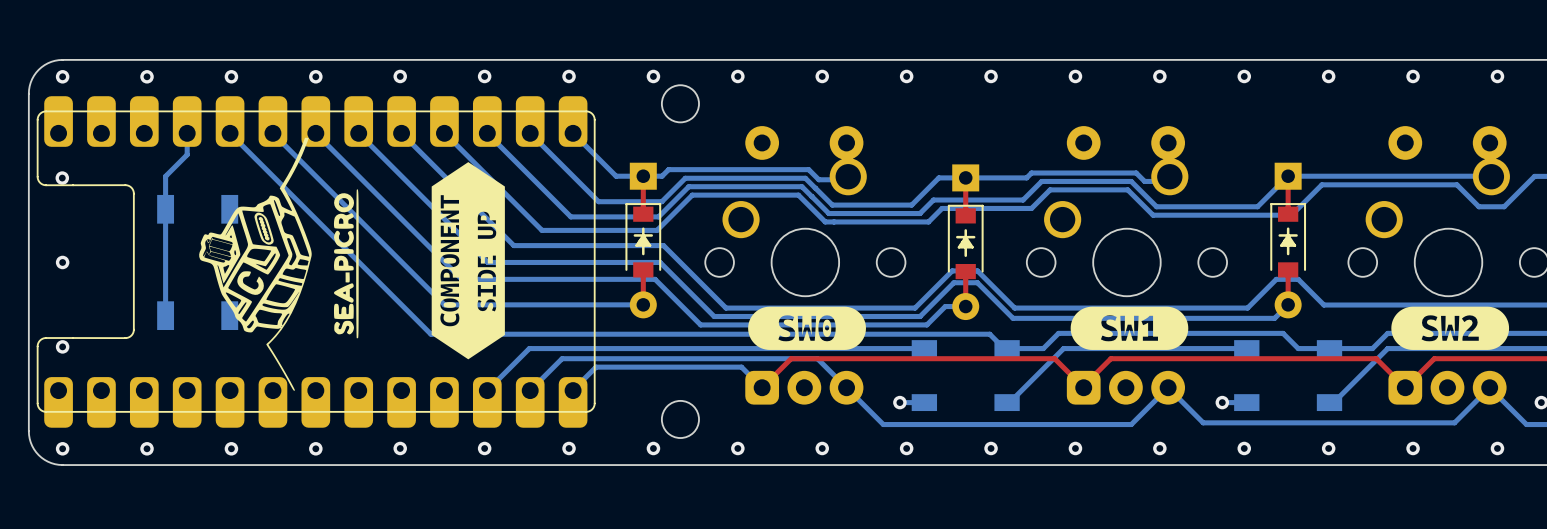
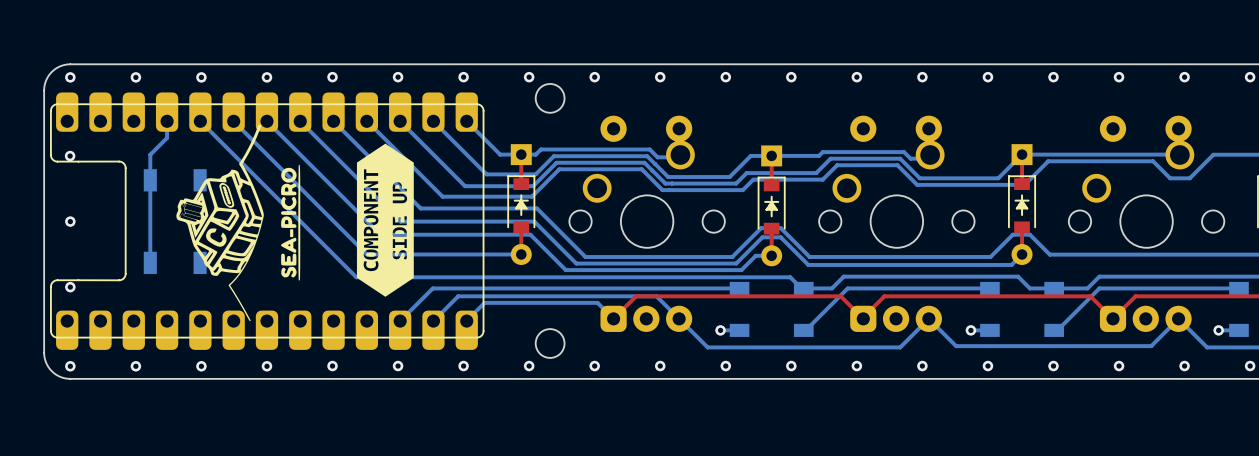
drawing: [748, 306, 866, 350] -> none
drawing: [1070, 306, 1189, 350] -> none
drawing: [1391, 306, 1510, 350] -> none

